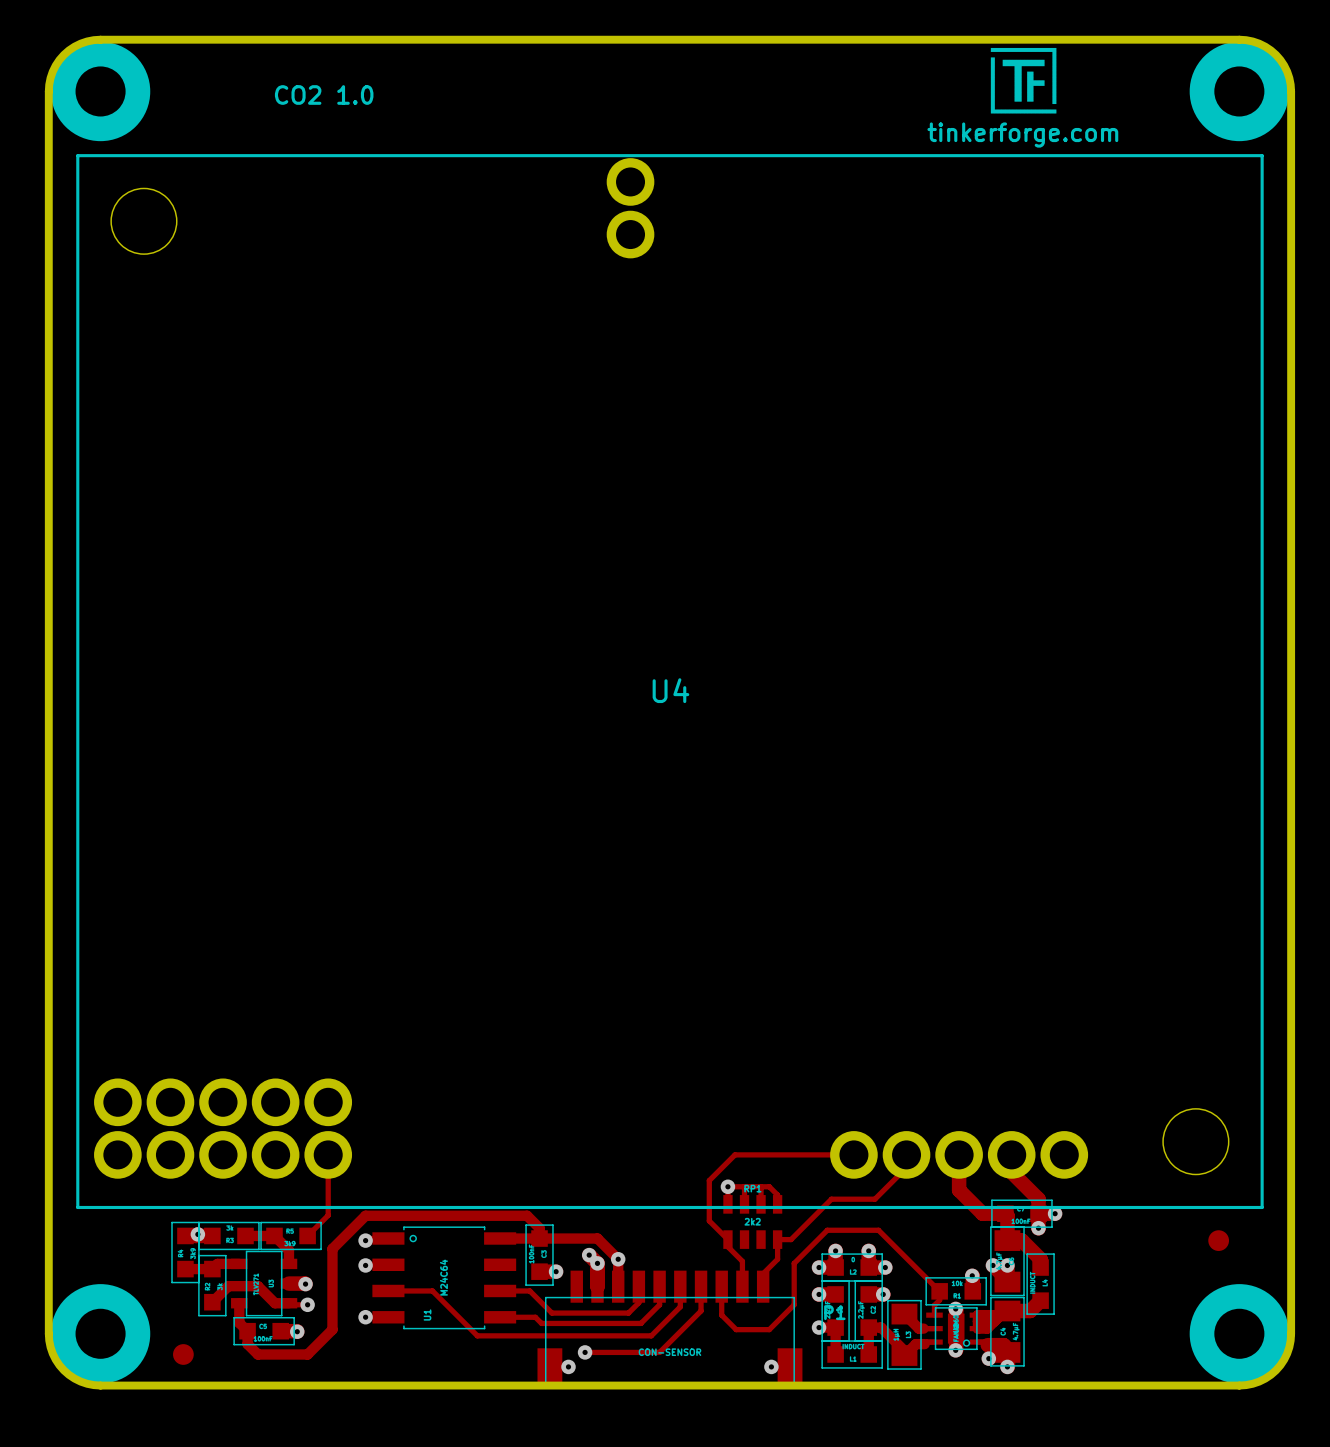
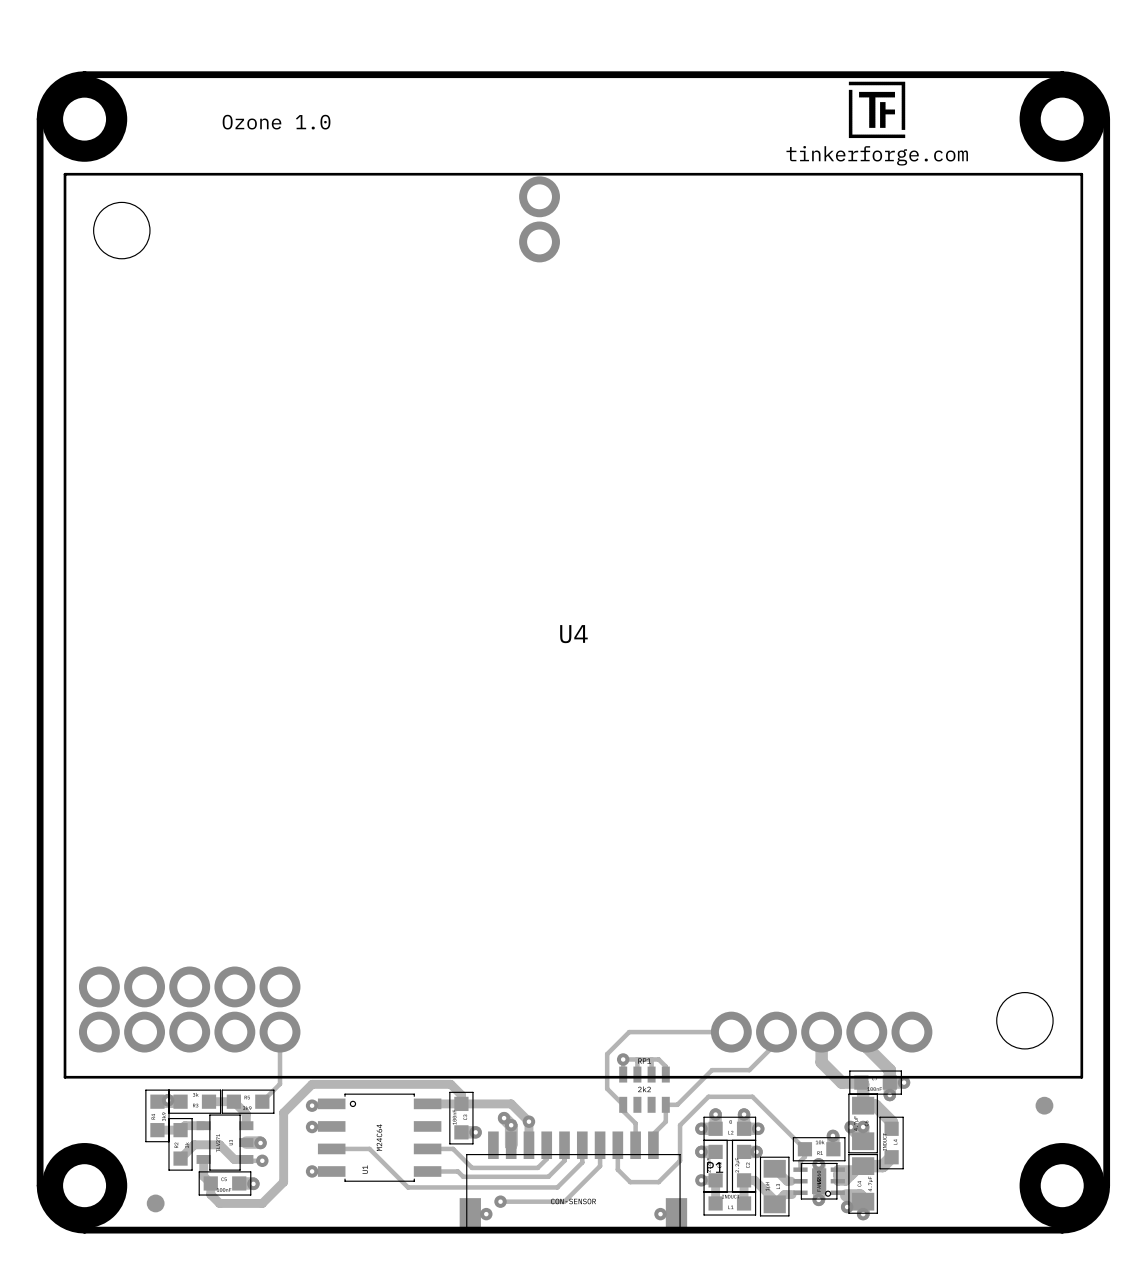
text: CO2 1.0 (324, 94) -> Ozone 1.0 (276, 122)

